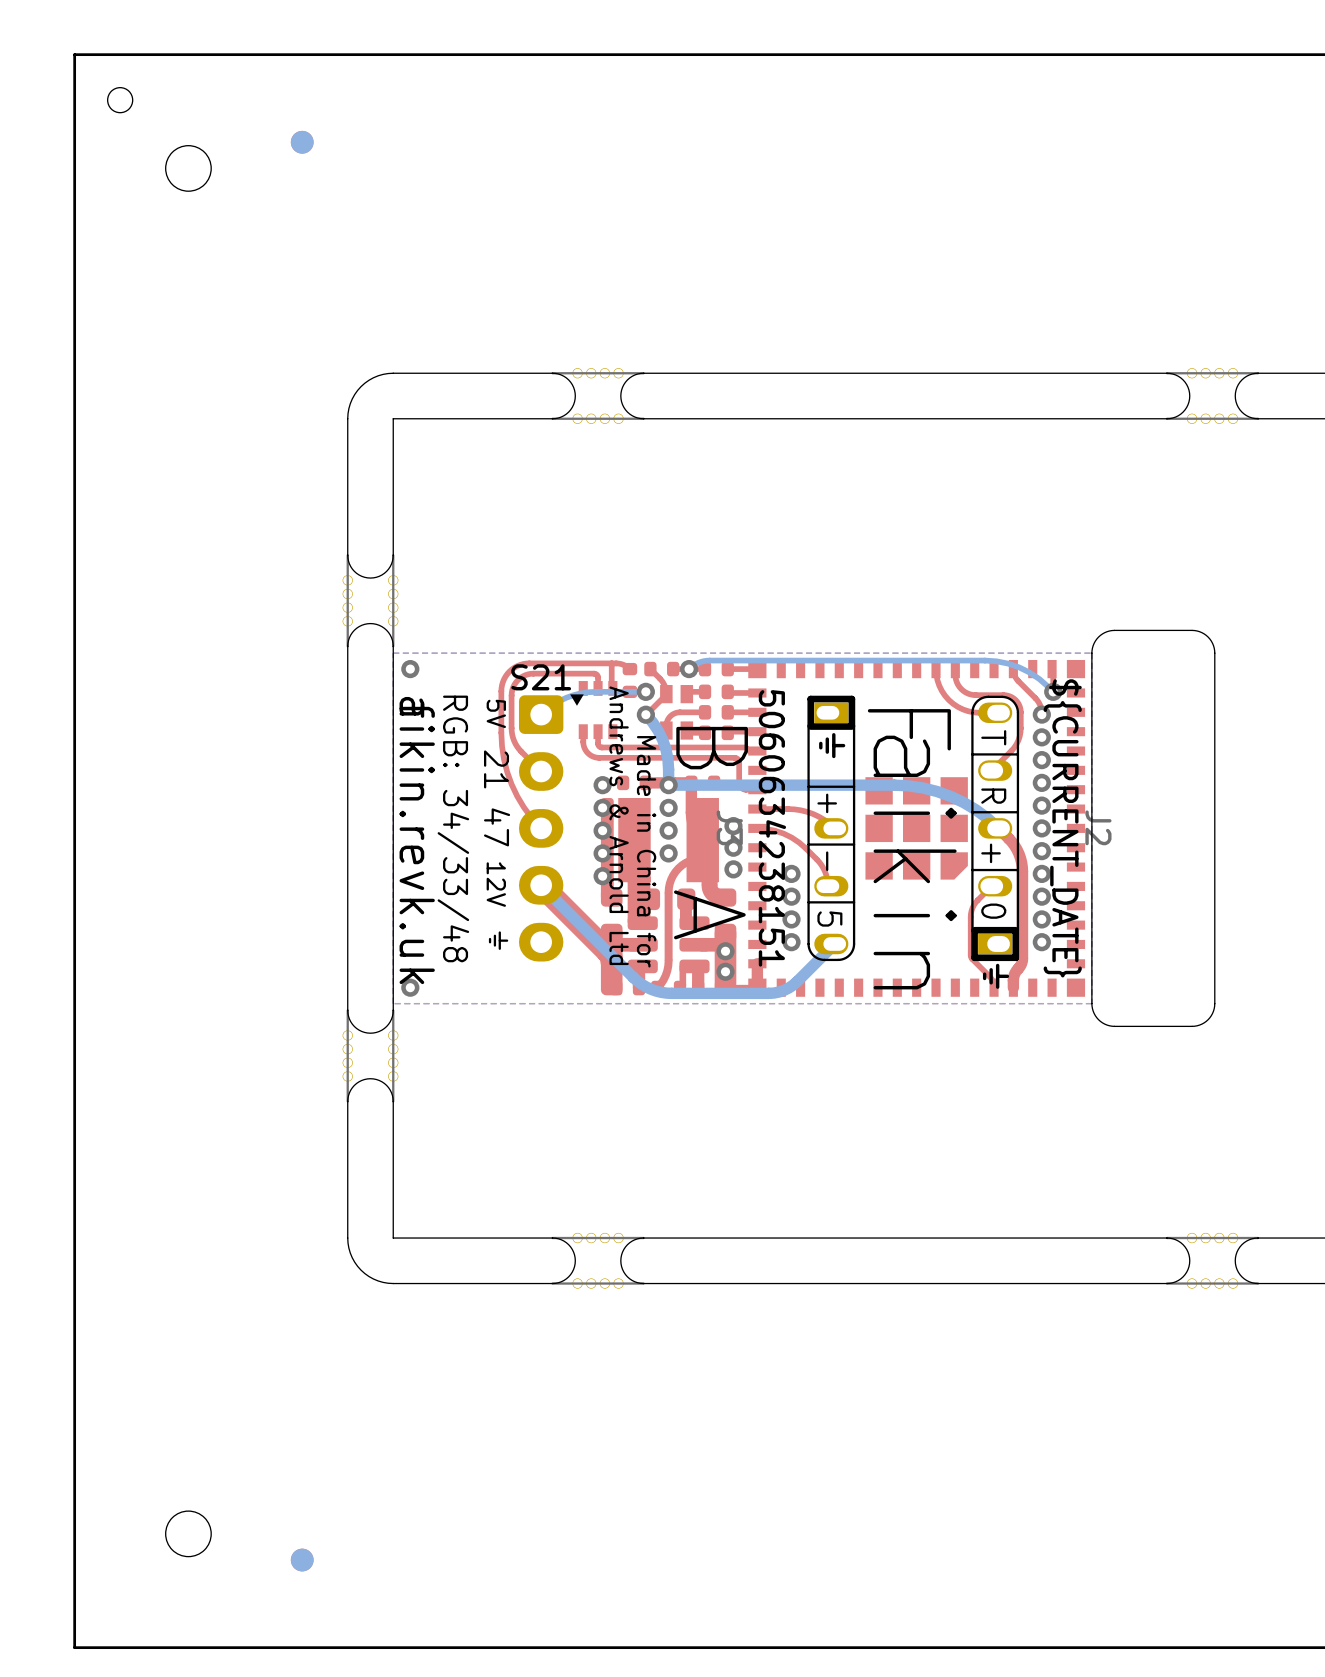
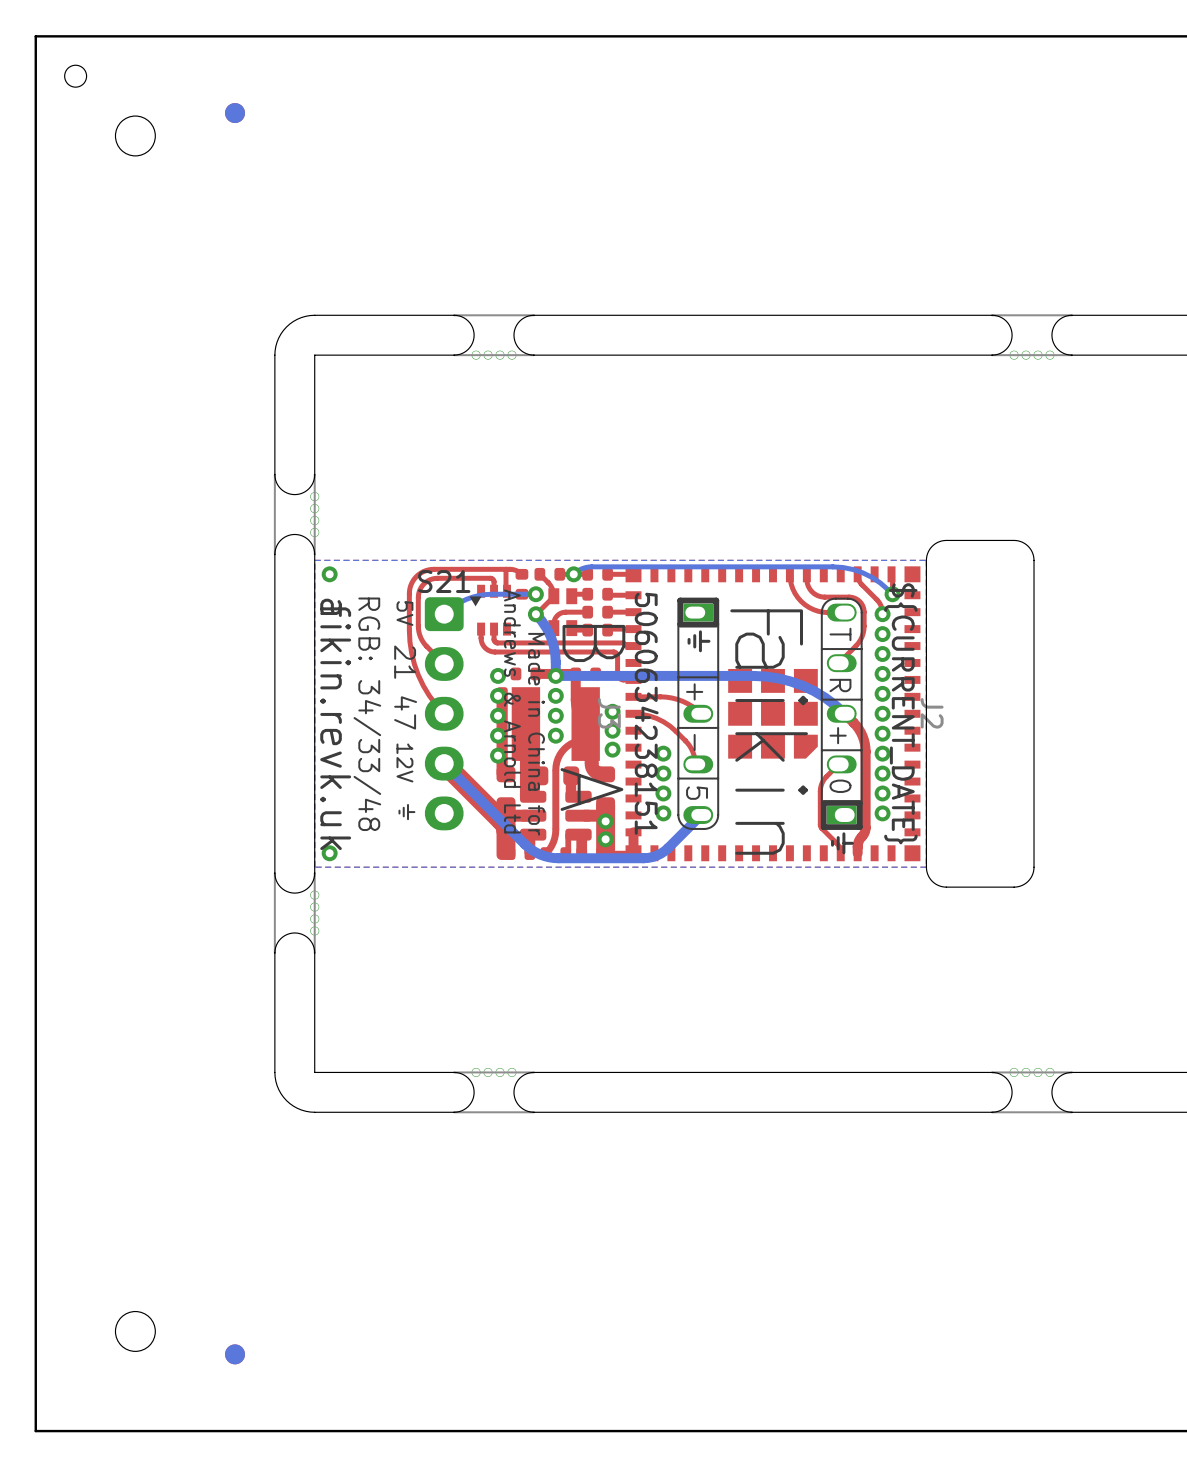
part footprint: [551, 368, 645, 424] -> [453, 314, 535, 360]
part footprint: [1165, 368, 1260, 424] -> [991, 314, 1073, 360]
part footprint: [342, 554, 399, 648] -> [273, 473, 320, 556]
part footprint: [342, 1009, 399, 1103] -> [273, 872, 320, 954]
part footprint: [551, 1232, 645, 1289] -> [453, 1067, 535, 1114]
part footprint: [1165, 1232, 1260, 1289] -> [991, 1067, 1073, 1114]

